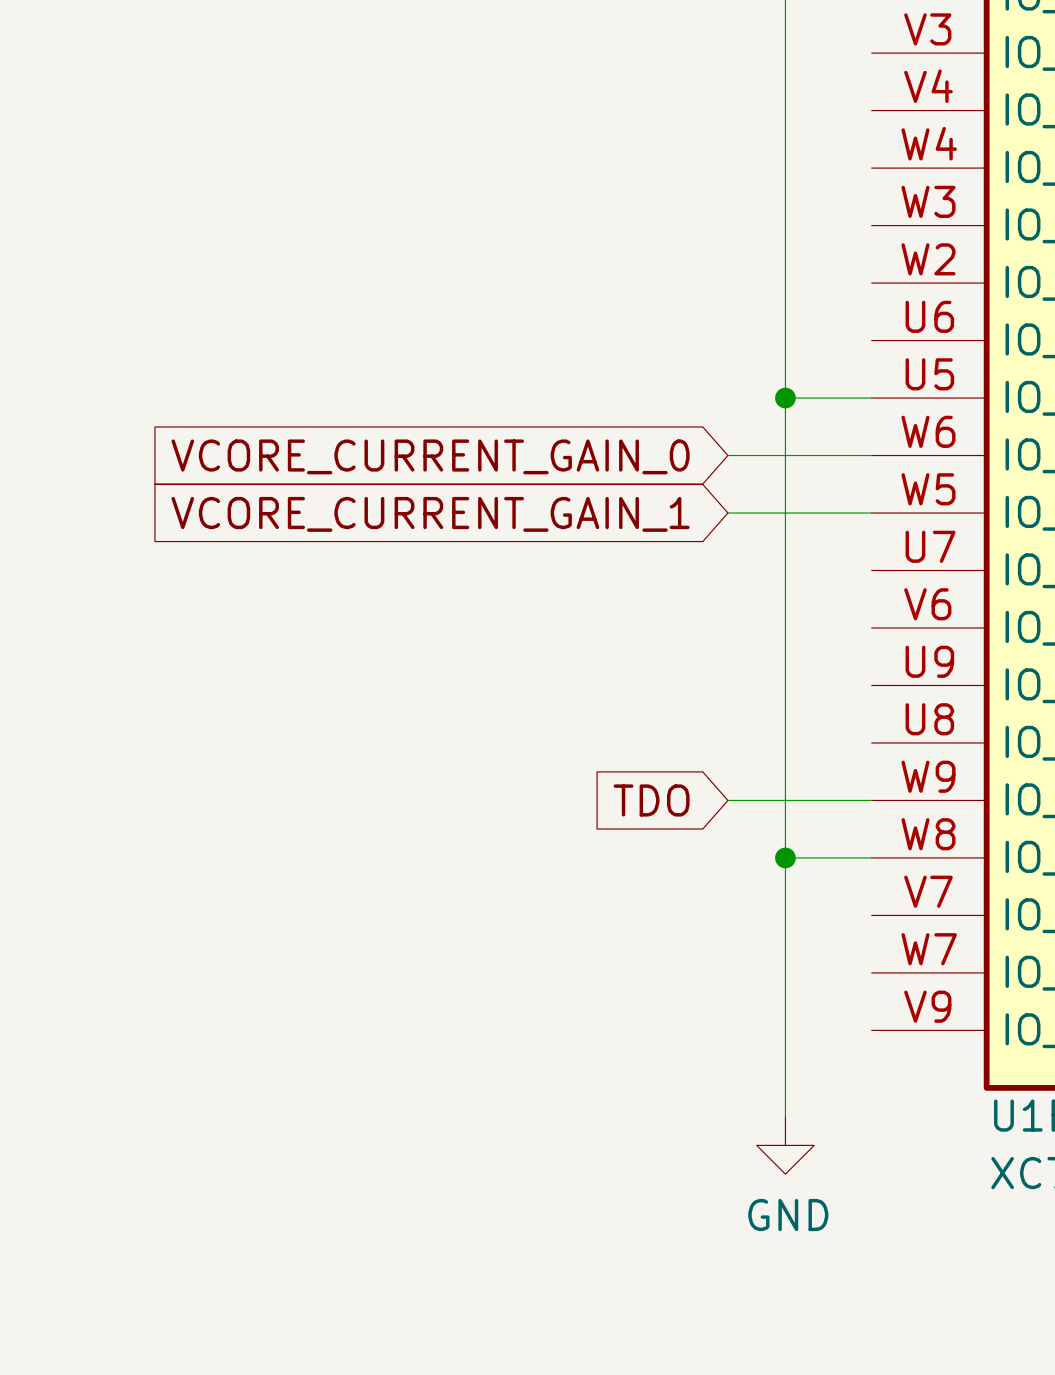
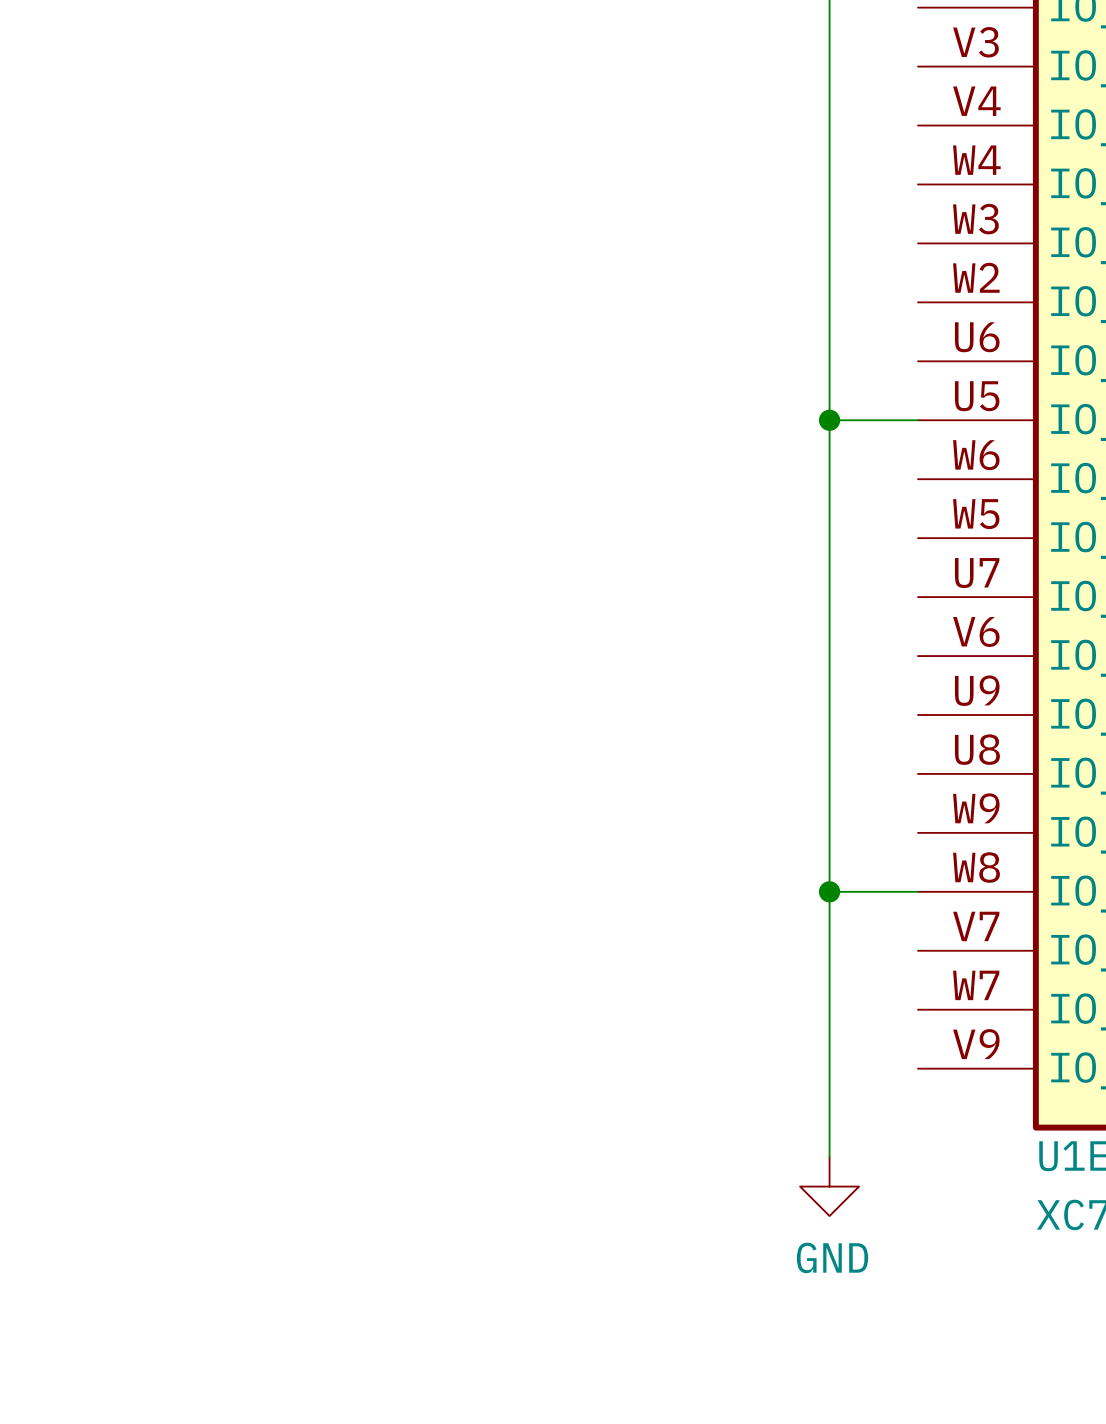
wire: (727, 455) (871, 455) -> none
global label: VCORE_CURRENT_GAIN_0 (430, 456) -> none
wire: (727, 513) (871, 513) -> none
global label: VCORE_CURRENT_GAIN_1 (430, 514) -> none
global label: TDO (651, 800) -> none
wire: (727, 800) (871, 800) -> none

